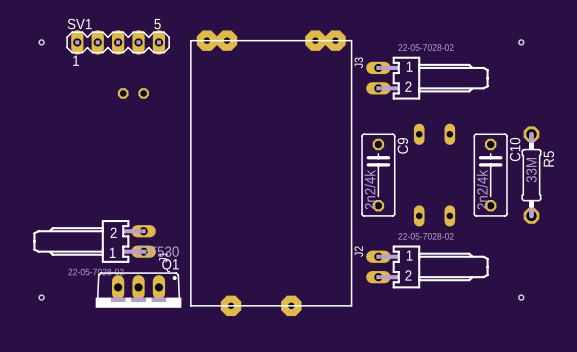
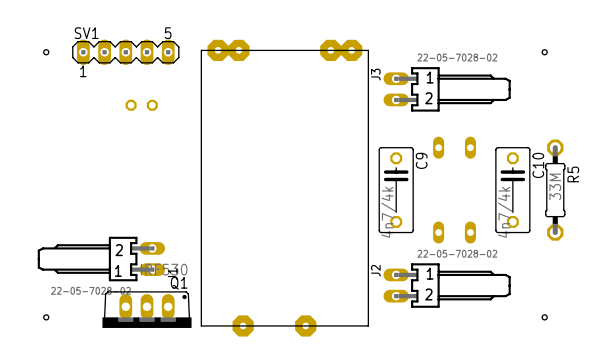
C9 value: 2n2/4k (370, 189) -> 4n7/4k (388, 212)
C10 value: 2n2/4k (482, 189) -> 4n7/4k (505, 212)

